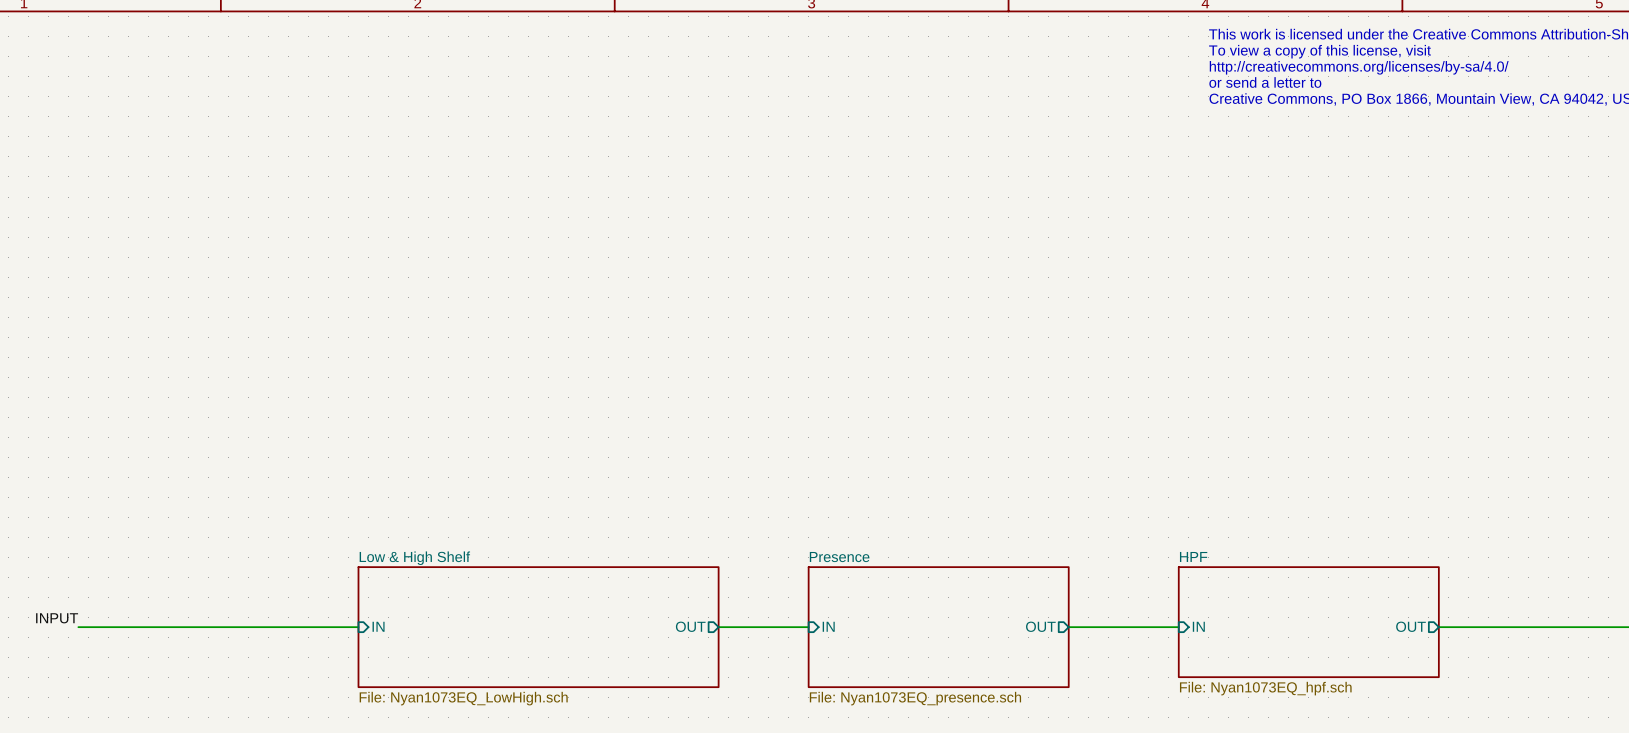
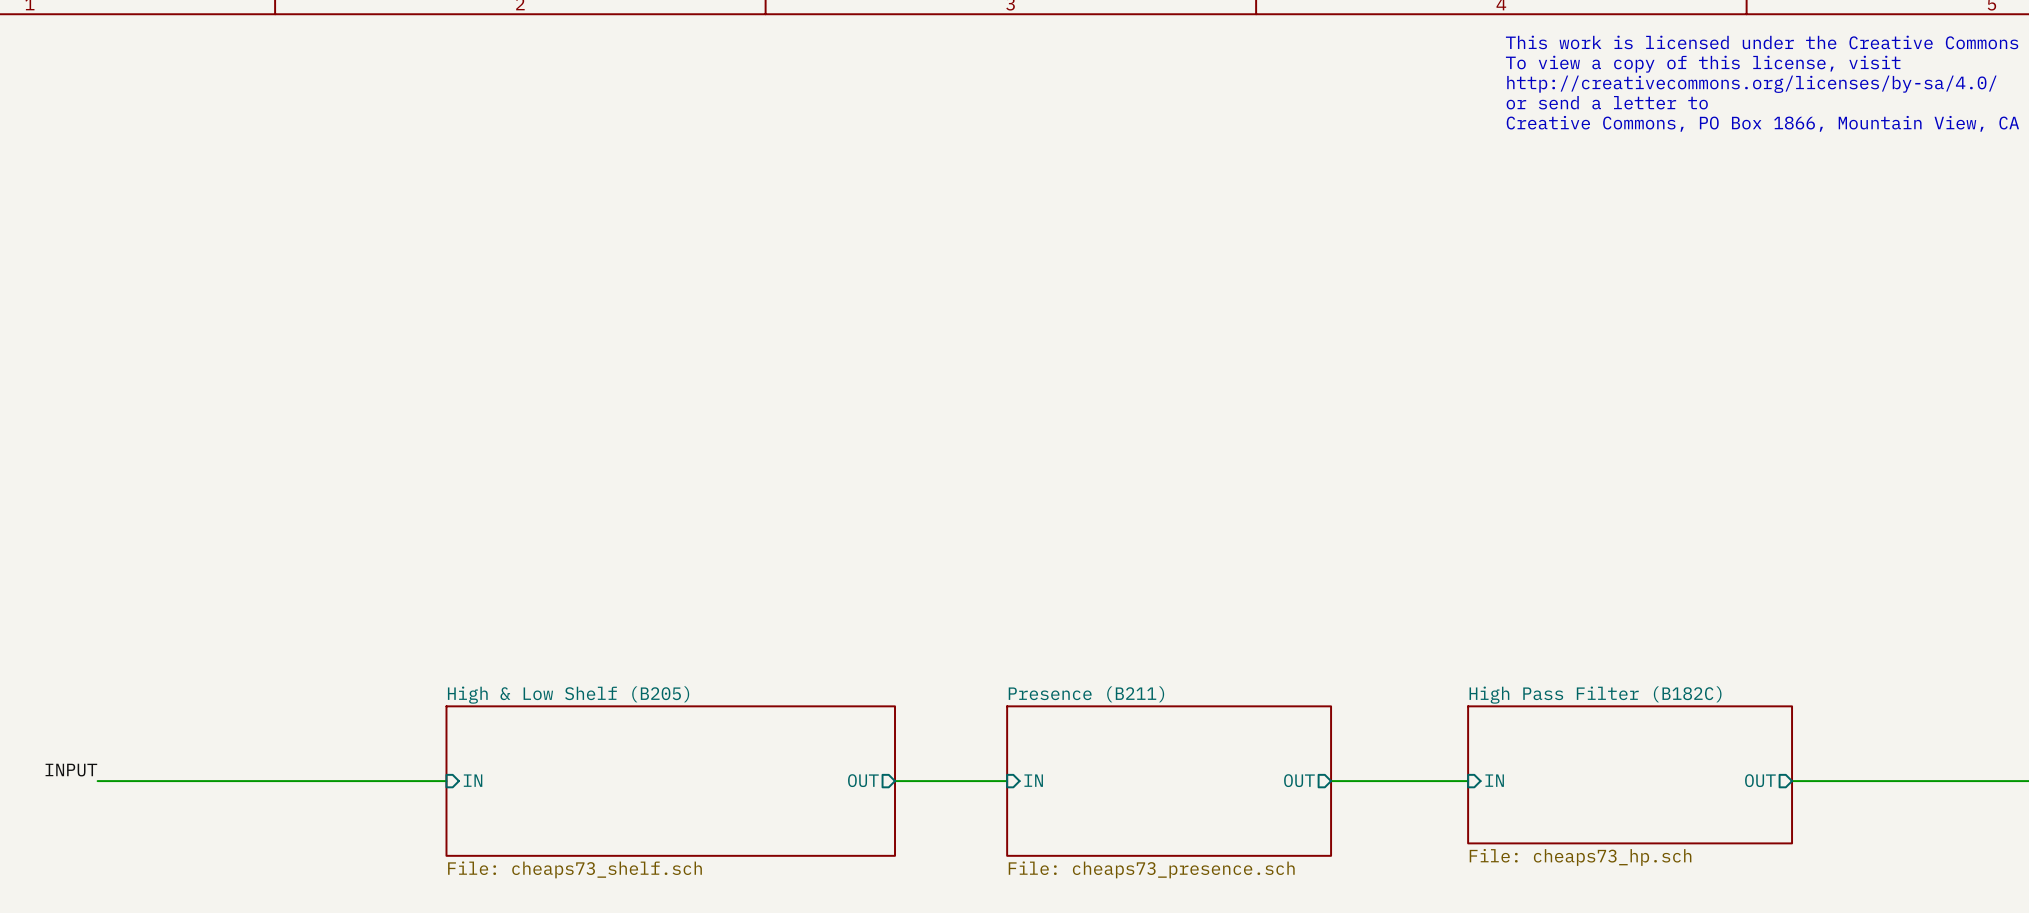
sheet HPF name: HPF (1193, 556) -> High Pass Filter (B182C) (1595, 695)
sheet Presence name: Presence (839, 557) -> Presence (B211) (1086, 694)
sheet Low & High Shelf name: Low & High Shelf (414, 558) -> High & Low Shelf (B205) (568, 695)
sheet HPF value: File: Nyan1073EQ_hpf.sch (1265, 688) -> File: cheaps73_hp.sch (1580, 857)
sheet Low & High Shelf value: File: Nyan1073EQ_LowHigh.sch (463, 698) -> File: cheaps73_shelf.sch (574, 869)
sheet Presence value: File: Nyan1073EQ_presence.sch (915, 698) -> File: cheaps73_presence.sch (1151, 869)

